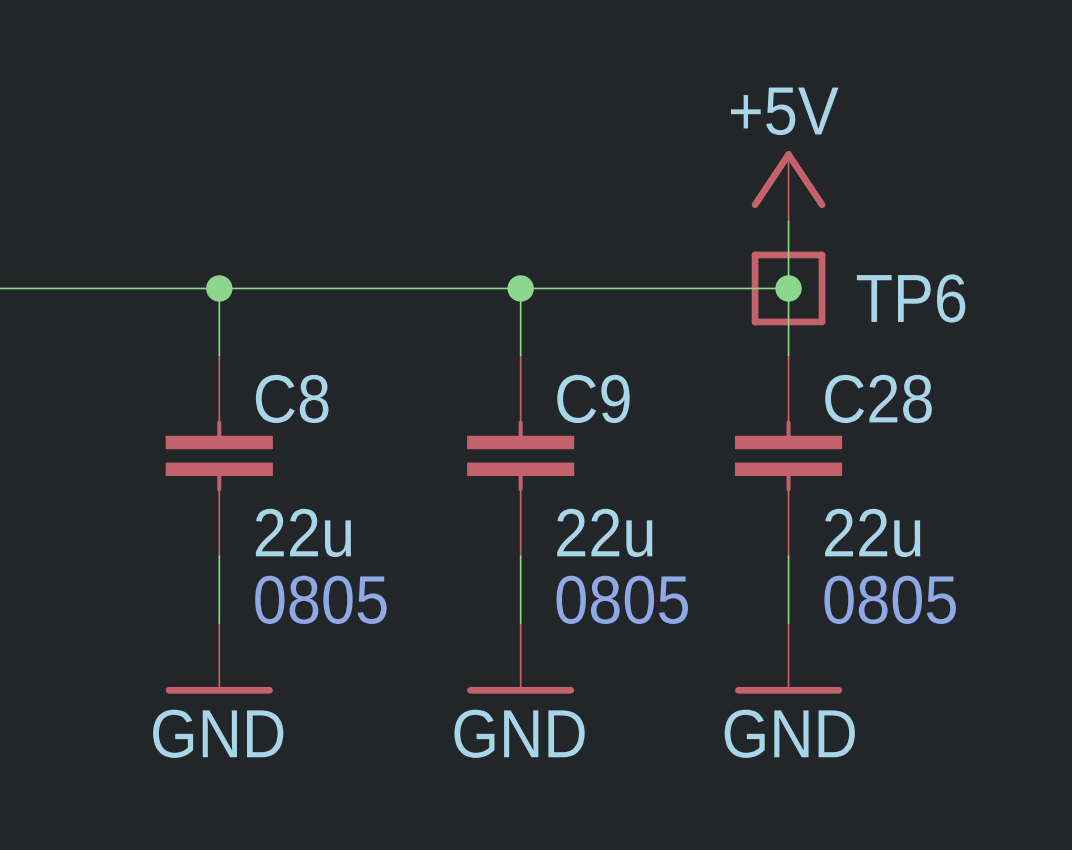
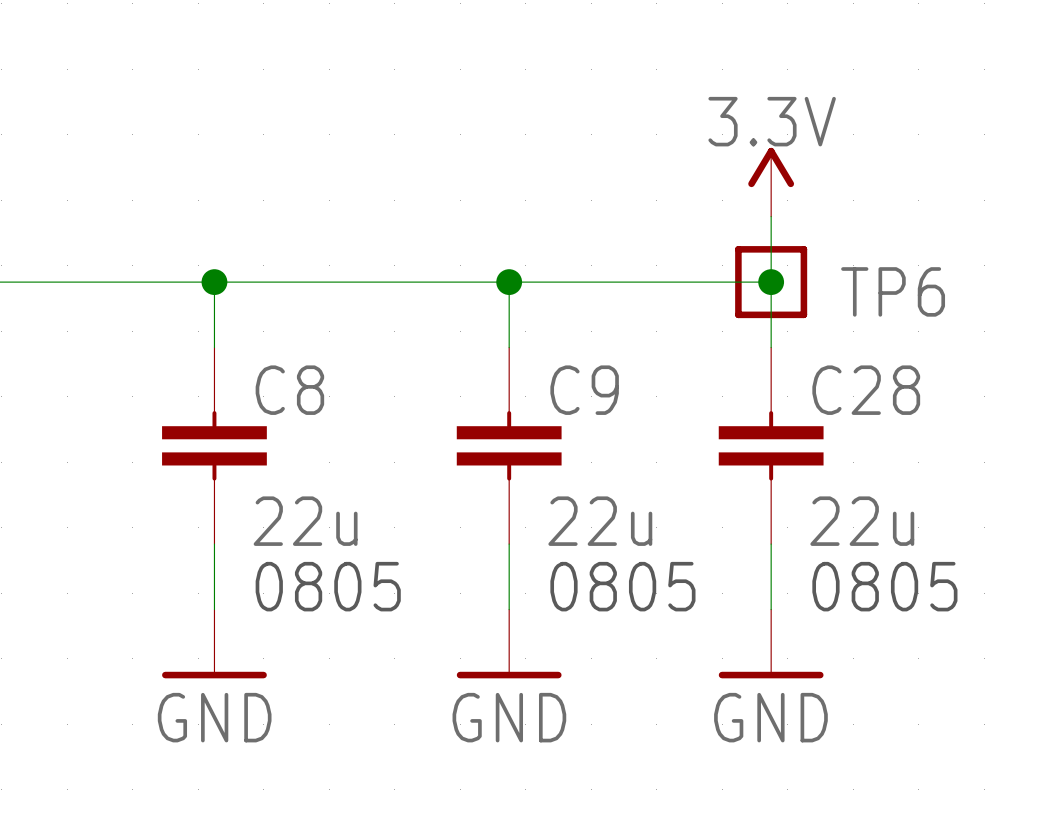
power symbol: +5V (788, 186) -> 3.3V (771, 182)

